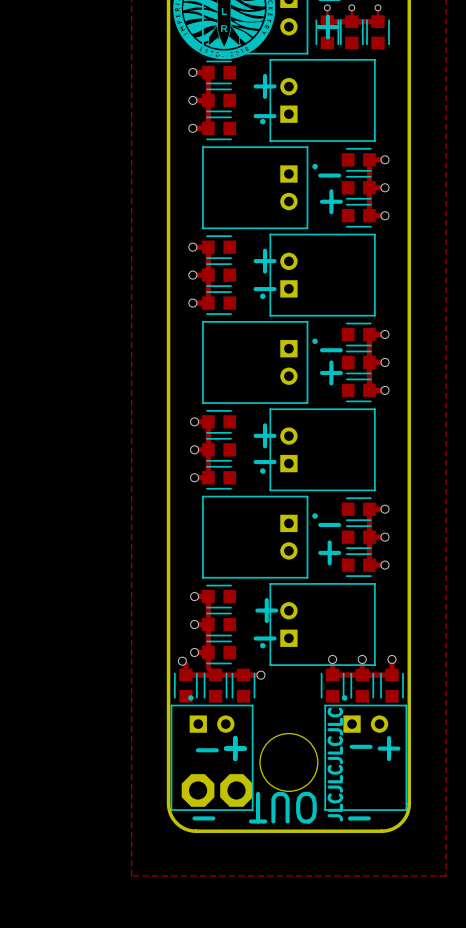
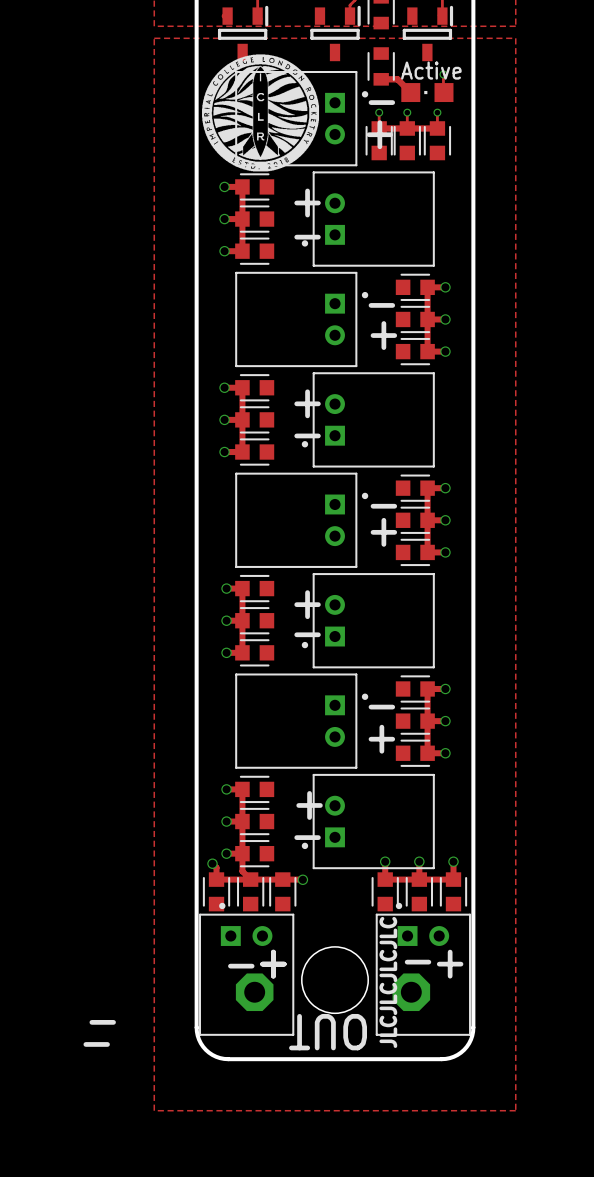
part: none -> (254, 992)
part: none -> (411, 992)
part: (198, 790) -> none
part: (236, 790) -> none
text: none -> - (102, 1022)
text: none -> - (96, 1044)
text: - (203, 818) -> none
text: - (359, 818) -> none

